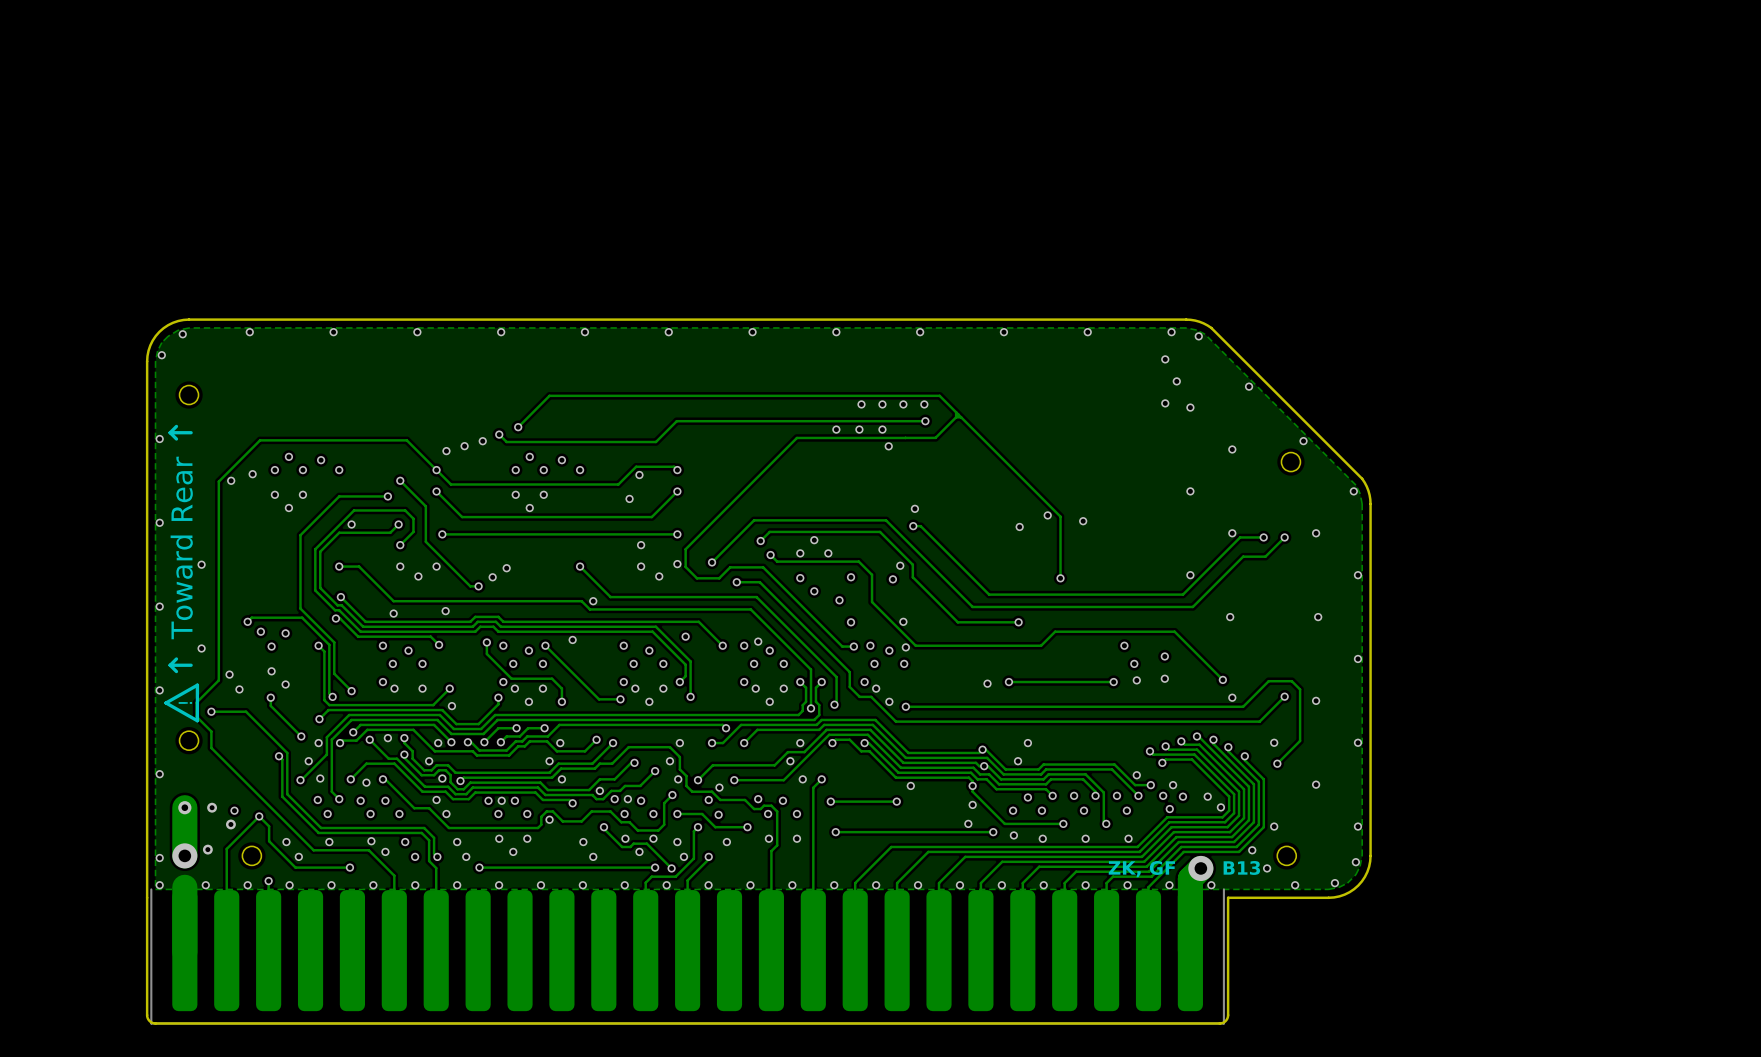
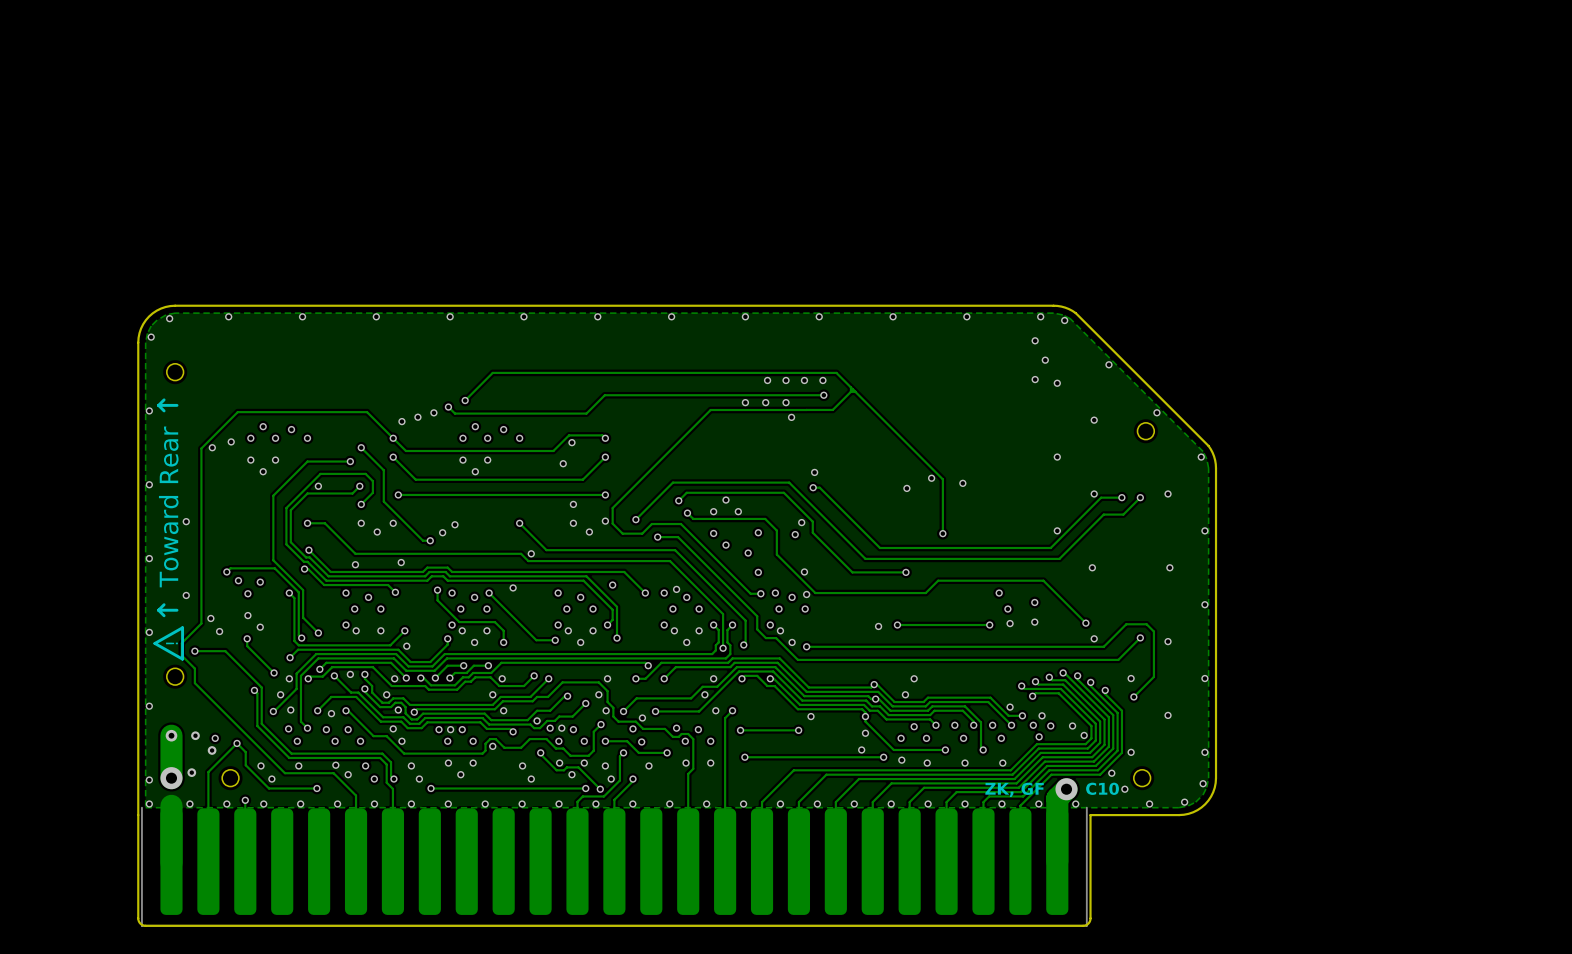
text: B13 (1241, 867) -> C10 (1102, 788)

